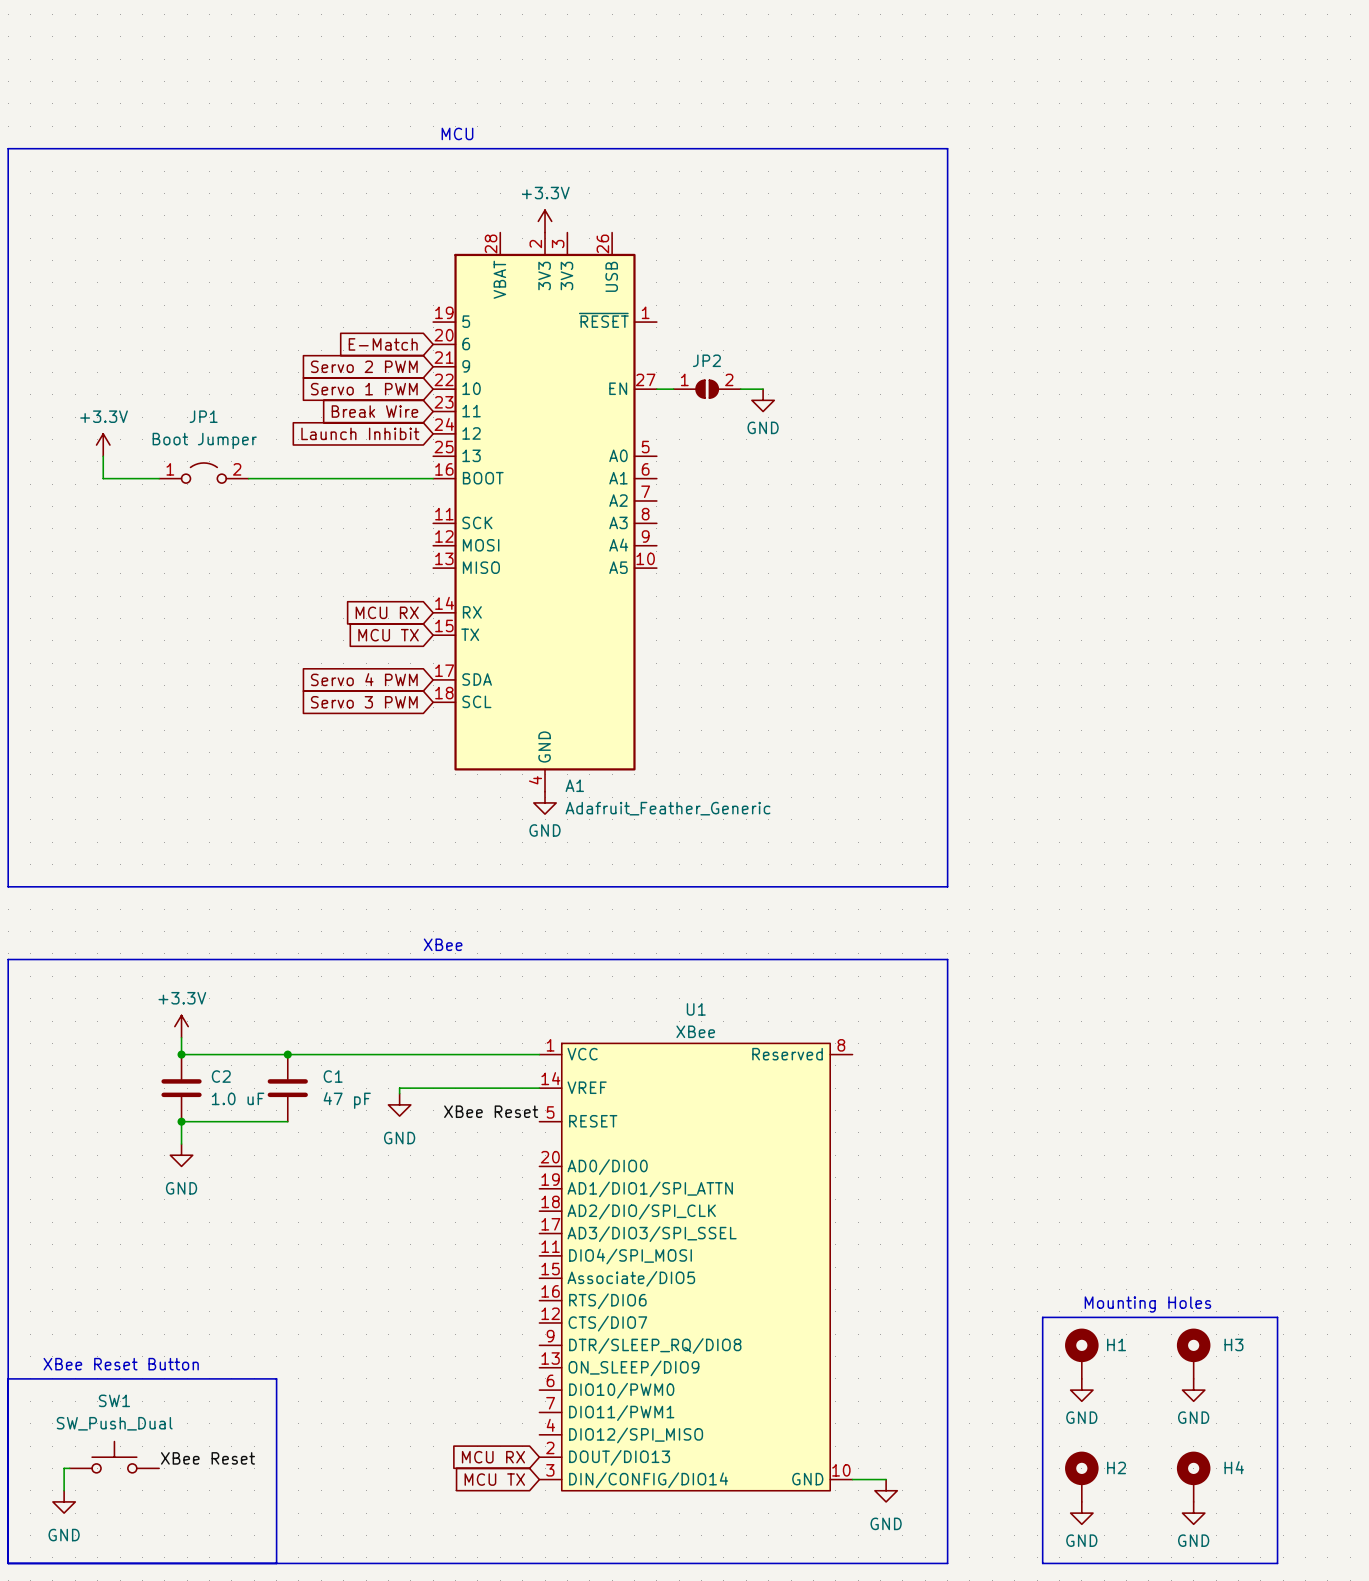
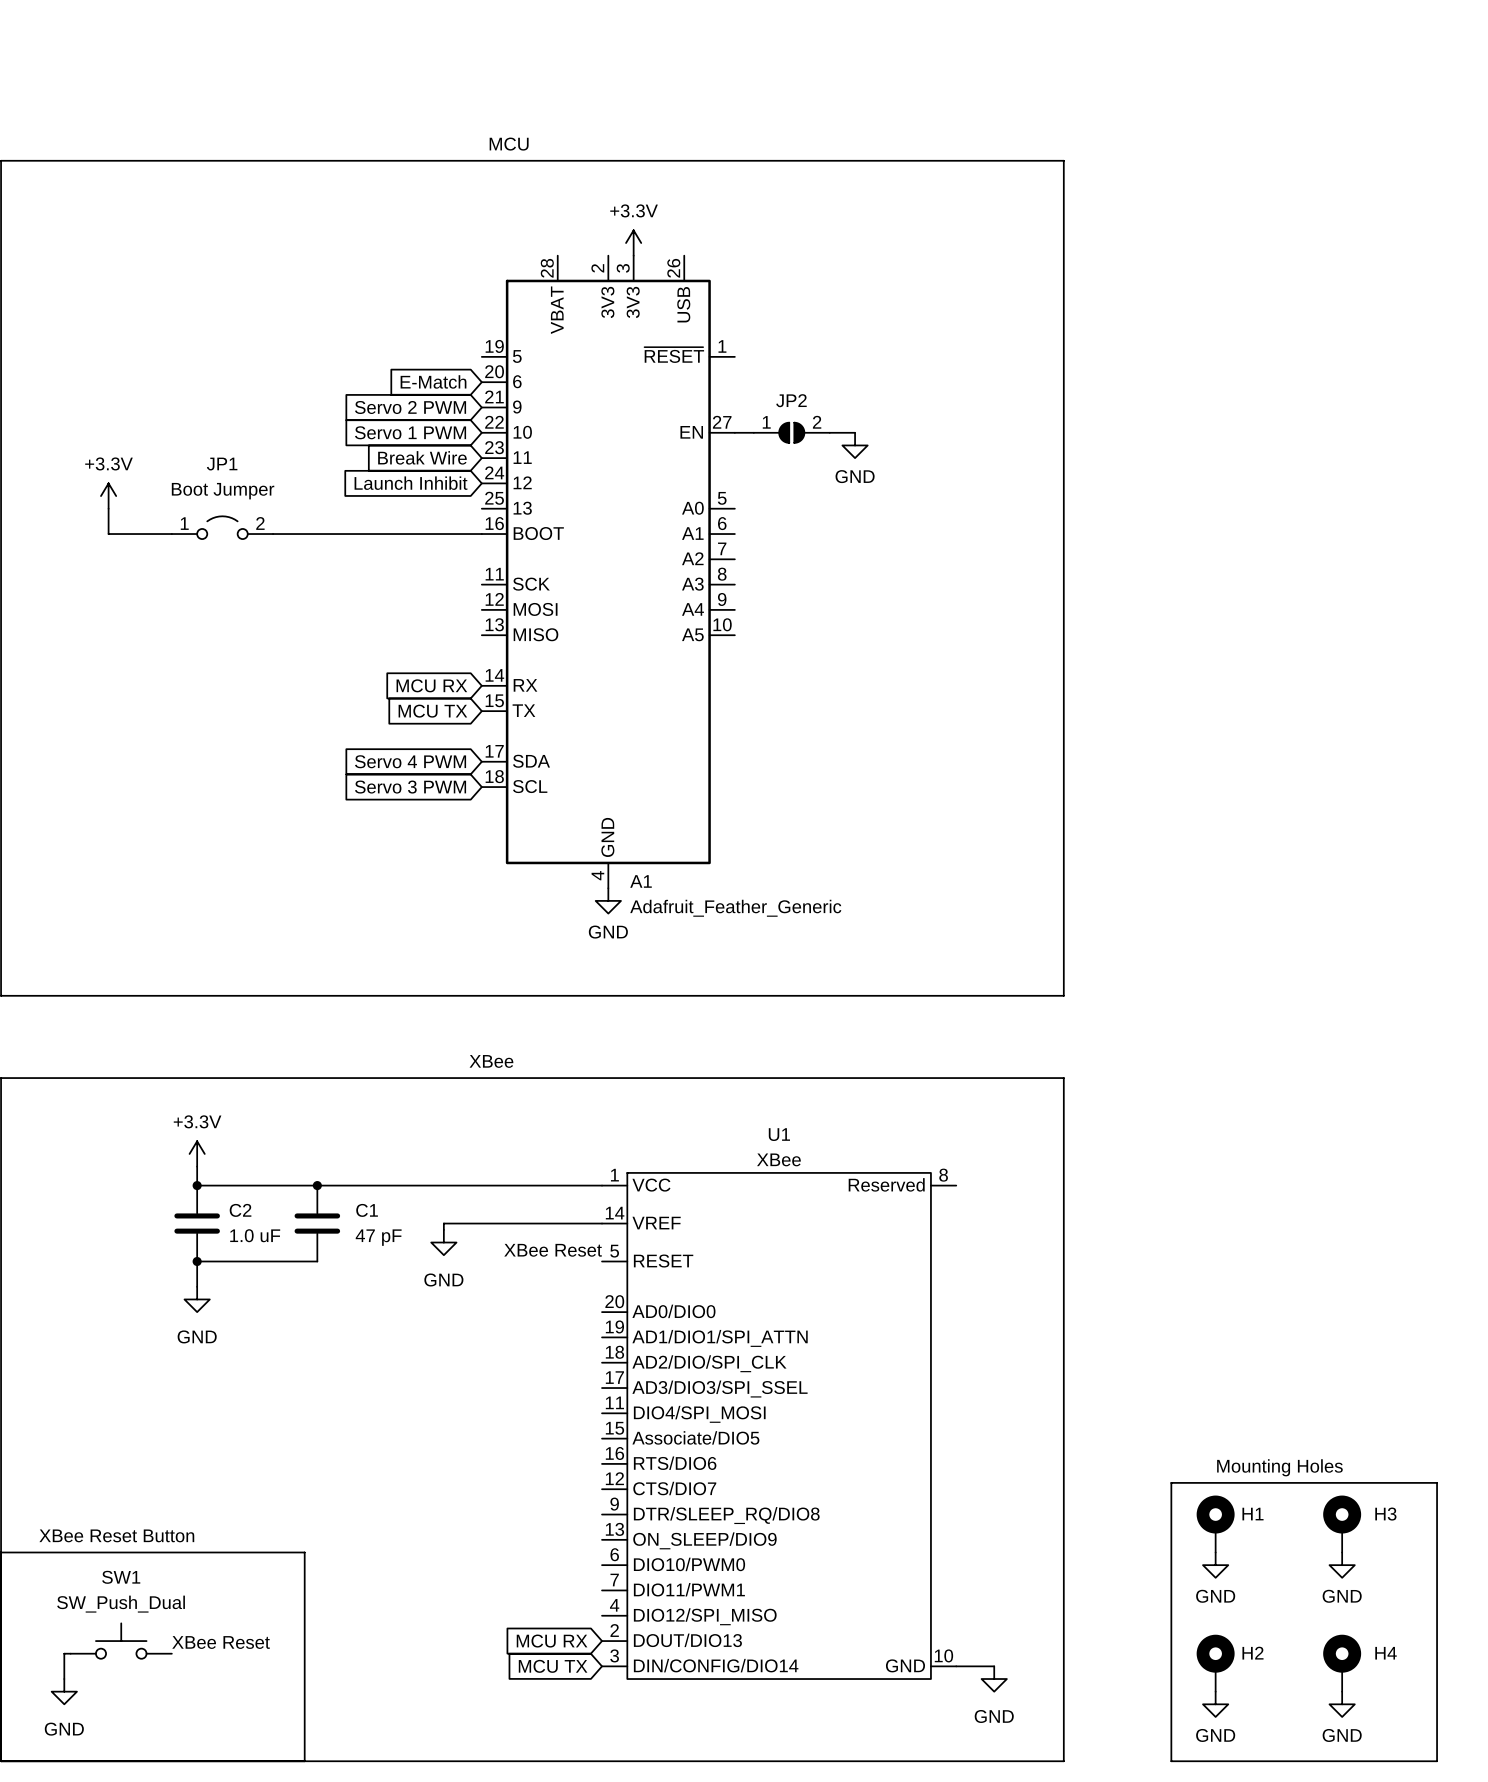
power symbol position: +3.3V (545, 221) -> +3.3V (633, 243)

